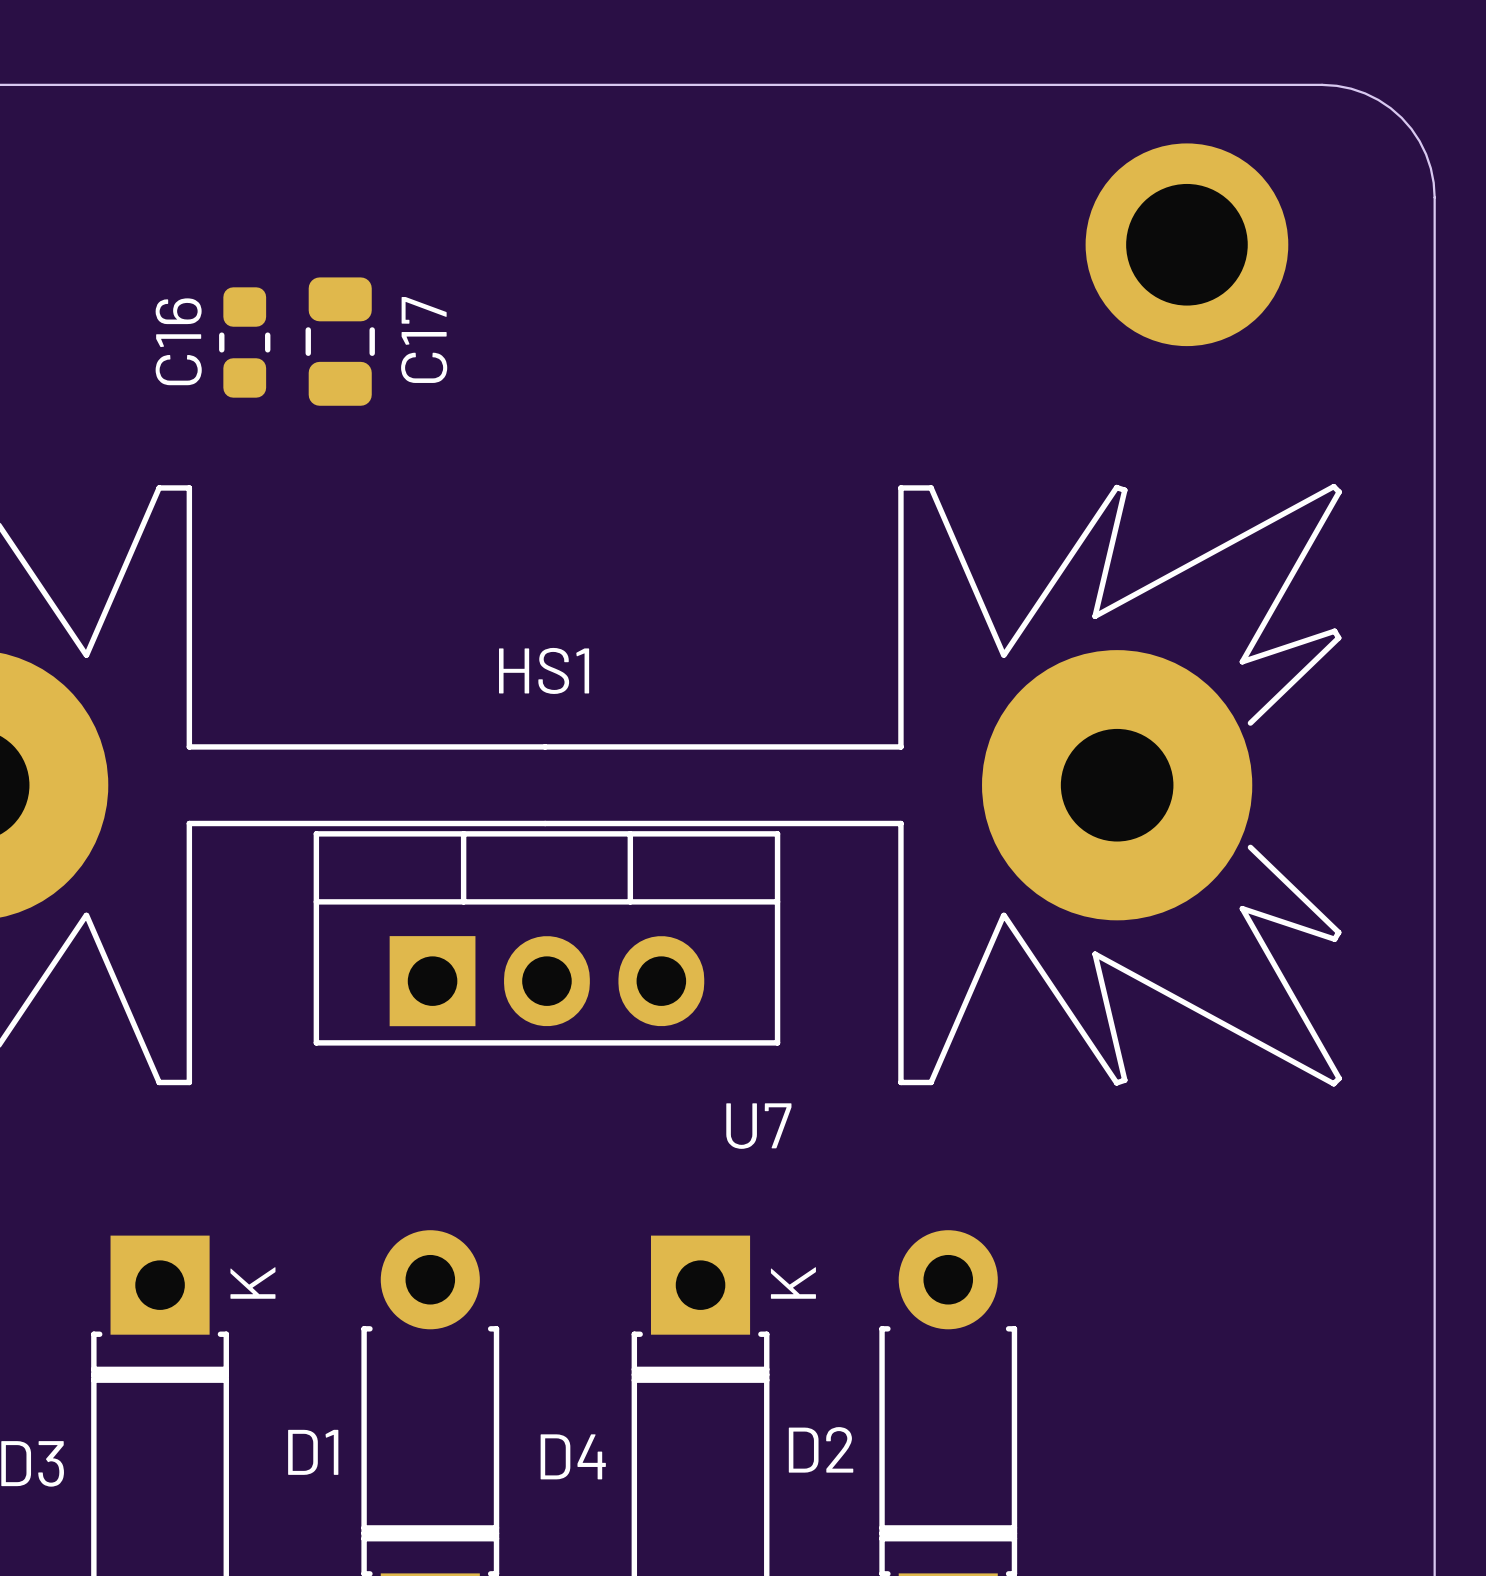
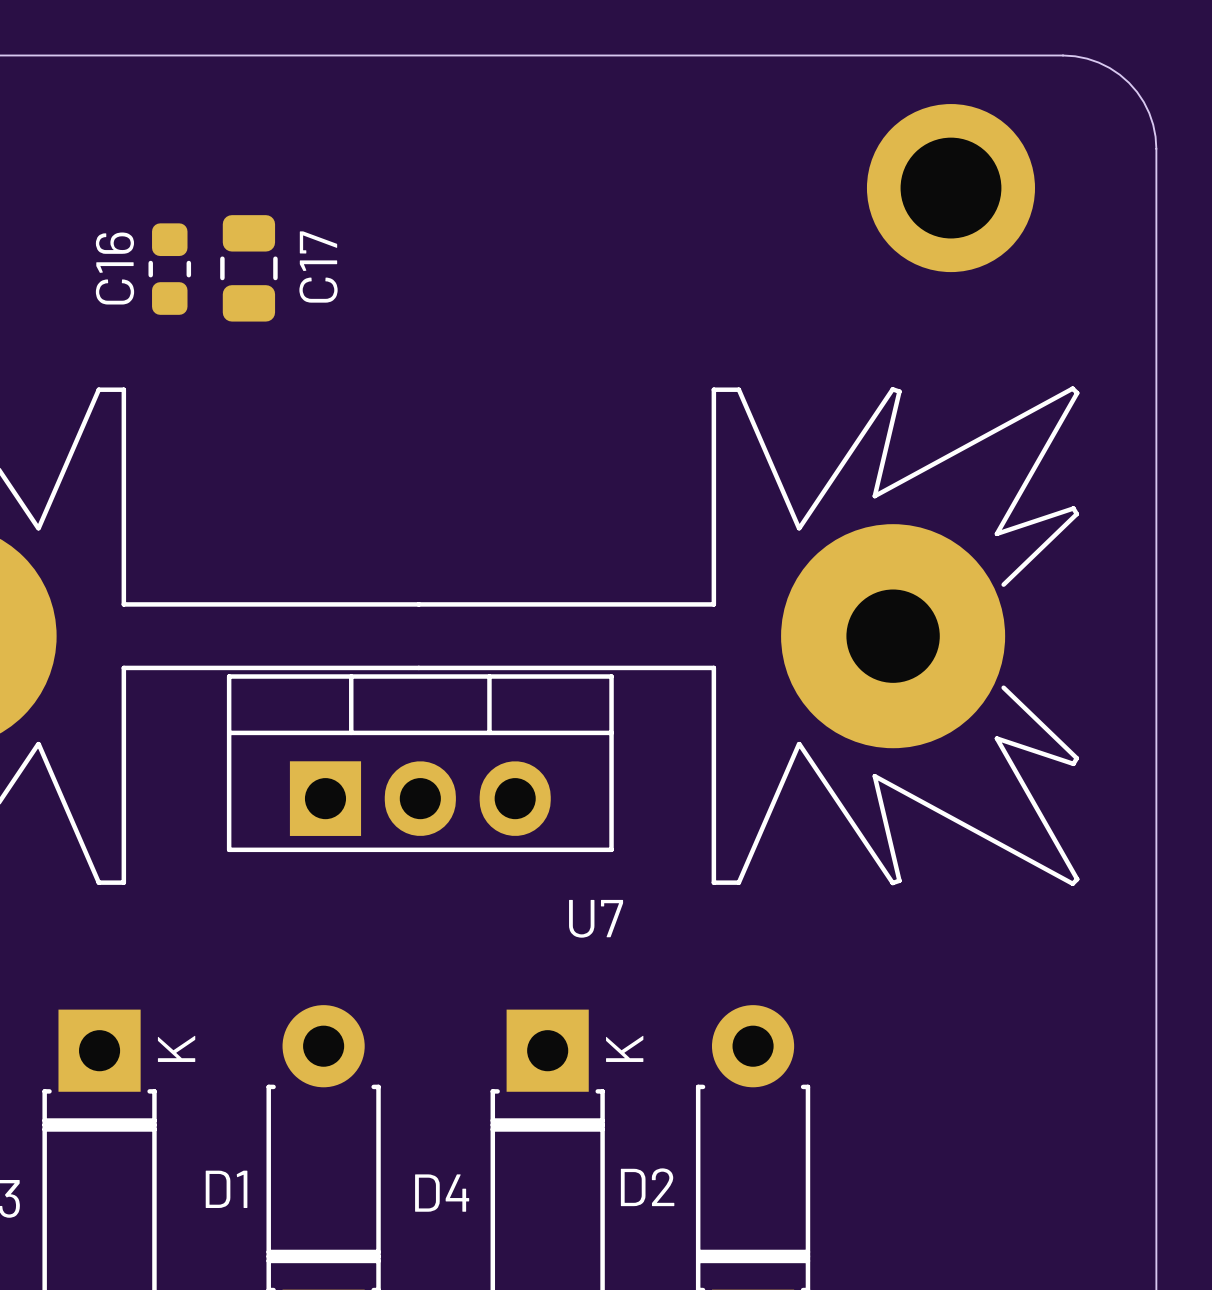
HS1 name: HS1 (544, 670) -> none

